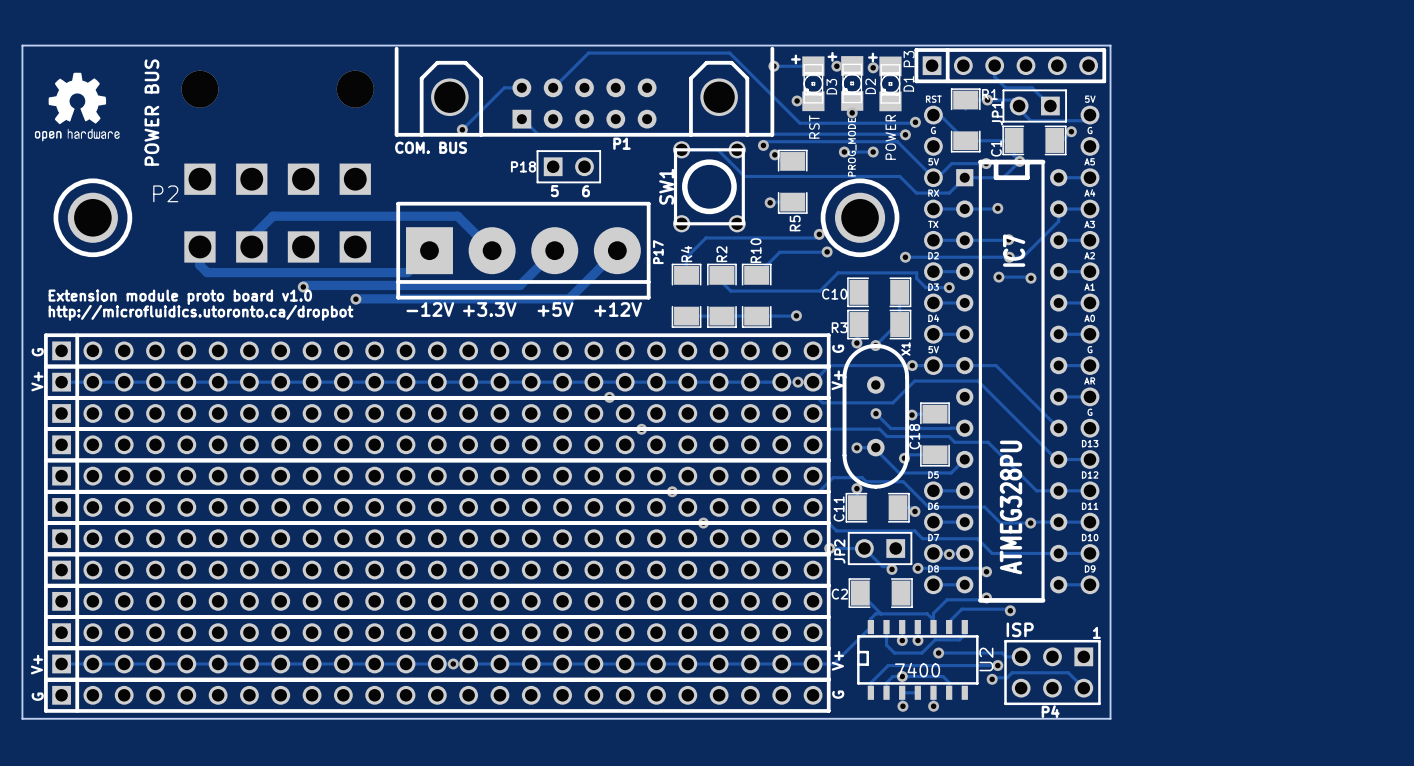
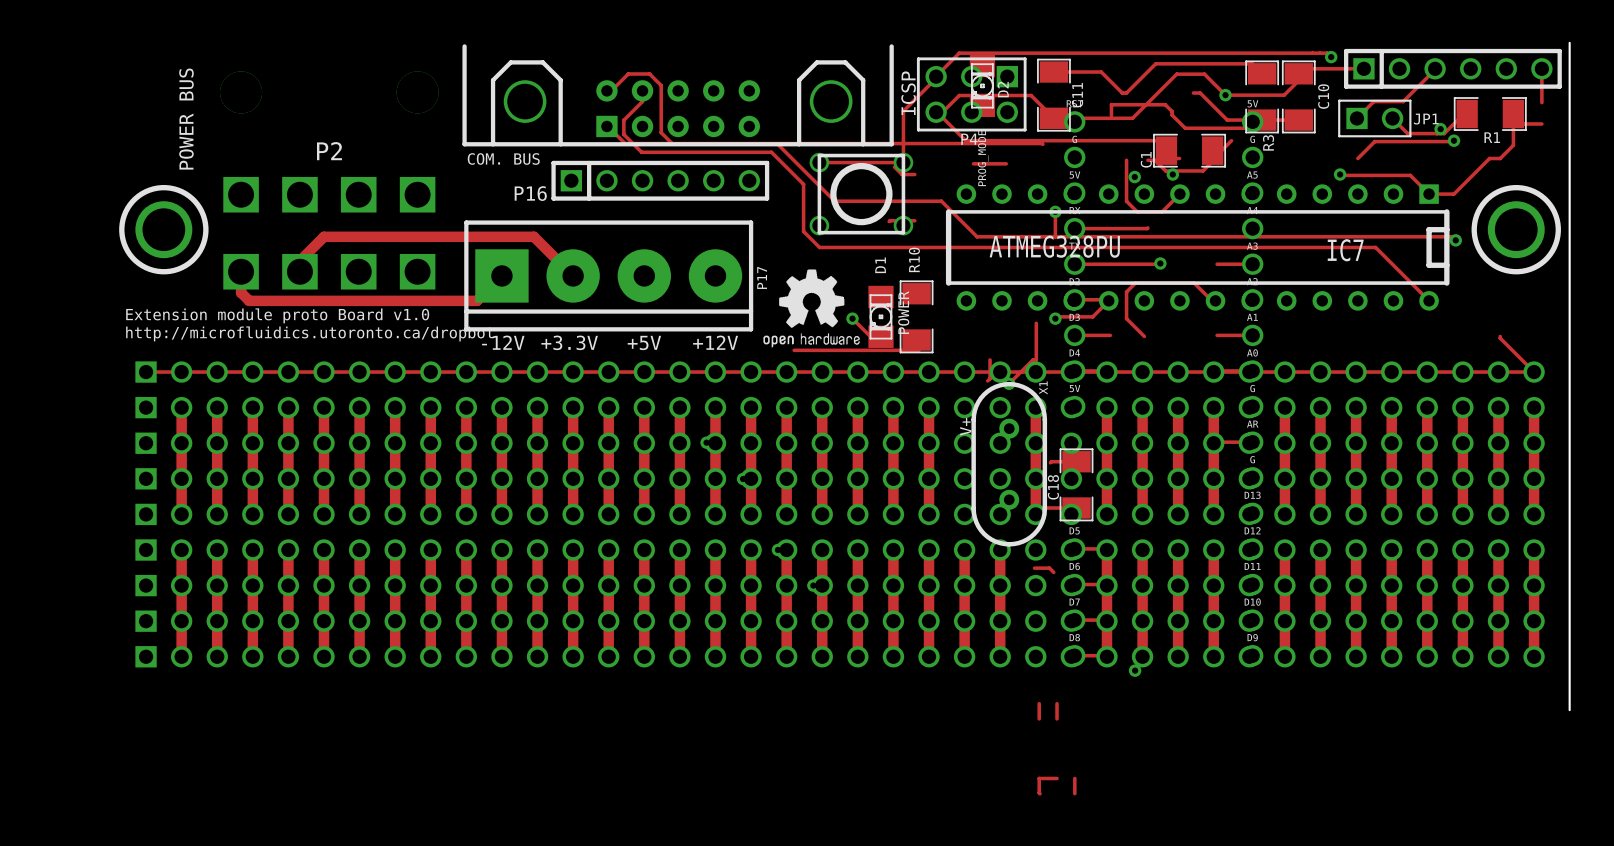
board edge: (22, 45) (22, 718) (1110, 718) (1110, 45) (22, 45) -> none
board edge: none -> (1569, 42) (1569, 710)
text: + (832, 56) -> none
text: + (872, 57) -> none
track: none -> (1331, 57) (1327, 53) (959, 53) (937, 76)
via: none -> (1331, 57)
text: + (795, 59) -> none
track: (994, 65) (994, 76) (1005, 87) (1032, 87) (1050, 106) -> none
P3: (1010, 65) -> none
track: (773, 66) (813, 66) -> none
via: (773, 66) -> none
via: (836, 66) -> none
via: (873, 67) -> none
track: none -> (1363, 68) (1303, 68) (1298, 73) (1298, 80) (1284, 95) (1225, 95) (1204, 74) (1176, 74) (1132, 118) (1053, 118) (1031, 95) (959, 95) (942, 112) (937, 112) (965, 140) (1157, 140) (1175, 158) (1179, 158)
track: none -> (1435, 68) (1403, 101) (1373, 101) (1357, 118)
part: none -> (1452, 68)
track: none -> (1541, 68) (1541, 102)
track: none -> (1053, 72) (1101, 72) (1122, 93) (1126, 93) (1155, 63) (1252, 63) (1262, 73)
drawing: [34, 72, 120, 142] -> none
track: none -> (936, 78) (903, 111) (903, 162) (819, 162)
D3: RST (813, 83) -> none
D1 position: (890, 83) -> (880, 316)
D1 name position: D1 (908, 83) -> D1 (880, 265)
track: (521, 87) (504, 87) (462, 129) -> (606, 90) (611, 90) (628, 73) (649, 73) (661, 85) (661, 132) (672, 144) (777, 144) (834, 201) (941, 201) (977, 236) (1452, 236) (1455, 240)
track: (553, 87) (588, 53) (729, 53) (799, 123) (915, 122) -> (642, 90) (642, 101) (623, 120) (623, 134) (641, 152) (771, 152) (803, 184) (803, 231) (819, 247) (1375, 247) (1429, 300)
track: none -> (1193, 93) (1200, 93) (1227, 120) (1298, 120)
text: none -> ICSP (908, 93)
via: none -> (1225, 95)
via: (797, 100) -> none
via: (987, 100) -> none
JP1 rotation: 0° (1034, 106) -> 180° (1374, 118)
JP1 position: (1034, 106) -> (1374, 118)
track: none -> (1513, 114) (1513, 145) (1500, 158) (1489, 158) (1453, 194) (1429, 194) (1410, 175) (1340, 174)
track: none -> (1513, 114) (1523, 123) (1541, 123)
via: (852, 112) -> none
track: none -> (1392, 118) (1407, 133) (1444, 133) (1463, 114) (1467, 114) (1462, 118)
track: (933, 115) (940, 115) (965, 140) (1014, 140) (1014, 155) (1019, 161) (1003, 177) (964, 177) (949, 193) (916, 193) (899, 176) (744, 176) (717, 149) (681, 149) -> none
R1 rotation: 0° (965, 120) -> 90° clockwise (1490, 114)
R1 position: (965, 120) -> (1490, 114)
via: none -> (1440, 129)
via: (915, 122) -> none
via: (462, 129) -> none
via: (1071, 131) -> none
track: none -> (1453, 140) (1374, 141) (1357, 158)
via: none -> (1453, 140)
via: (905, 134) -> none
D1 value position: POWER (890, 137) -> POWER (903, 312)
P1 name: P1 (621, 143) -> none
track: (763, 145) (767, 141) (897, 141) (933, 177) (937, 177) (951, 163) (986, 163) -> none
via: (763, 145) -> none
track: none -> (1215, 158) (1203, 170) (1165, 170) (1155, 160) (1147, 160)
track: none -> (1126, 160) (1126, 201) (1137, 211) (1162, 211) (1179, 194)
via: (844, 152) -> none
via: (873, 152) -> none
via: (774, 154) -> none
via: none -> (1340, 174)
P18: (568, 166) -> none
P16: none -> (660, 180)
track: (1058, 177) (1089, 177) -> none
part: none -> (861, 194)
R5: (792, 181) -> none
SW1: (709, 186) -> none
text: 5 (554, 191) -> none
text: 6 (586, 191) -> none
P2 name position: P2 (165, 193) -> P2 (329, 151)
track: none -> (1055, 211) (1055, 236)
via: none -> (1055, 211)
via: (770, 202) -> none
via: (997, 208) -> none
track: (1089, 209) (1058, 209) (1058, 221) (1022, 257) (905, 257) -> none
part: none -> (1516, 229)
part position: (92, 217) -> (163, 229)
part: (860, 217) -> none
via: none -> (1455, 240)
track: (819, 234) (815, 237) (705, 237) (686, 257) (686, 275) -> none
via: (819, 234) -> none
drawing: none -> [763, 269, 860, 348]
track: (554, 250) (519, 285) (304, 285) (303, 286) -> none
track: (617, 250) (569, 298) (355, 299) -> none
R10 name position: R10 (756, 250) -> R10 (914, 259)
track: (827, 251) (779, 252) (756, 275) -> none
via: (827, 251) -> none
via: (905, 257) -> none
via: (1009, 257) -> none
track: (1058, 271) (1089, 271) -> none
track: none -> (1108, 300) (1092, 316) (1057, 316) (1055, 318)
track: none -> (1215, 300) (1211, 300) (1194, 283) (1135, 283) (1126, 291) (1126, 318) (1144, 336)
track: (721, 275) (721, 282) (730, 291) (819, 291) (838, 272) (916, 272) (916, 278) (925, 287) (949, 287) -> none
track: (998, 277) (1031, 278) -> none
via: (998, 277) -> none
via: (1031, 278) -> none
via: (303, 286) -> none
via: (949, 287) -> none
track: none -> (852, 318) (870, 336) (880, 336)
via: none -> (852, 318)
via: none -> (1055, 318)
C10 rotation: 0° (879, 292) -> 90° clockwise (1298, 96)
C10 position: (879, 292) -> (1298, 96)
C10 name position: C10 (834, 294) -> C10 (1323, 96)
R4: (686, 295) -> none
R2: (721, 295) -> none
R10 position: (756, 295) -> (916, 316)
text: Extension module proto board v1.0 (180, 297) -> Extension module proto Board v1.0 (277, 315)
via: (355, 299) -> none
track: none -> (1500, 336) (1534, 372) (146, 372)
text position: http://microfluidics.utoronto.ca/dropbot (201, 312) -> http://microfluidics.utoronto.ca/dropbot (309, 333)
via: (796, 315) -> none
R3 rotation: 0° (879, 324) -> 90° clockwise (1262, 96)
R3 position: (879, 324) -> (1262, 96)
R3 name position: R3 (839, 327) -> R3 (1268, 142)
part: none -> (840, 372)
via: (856, 343) -> none
text: G (838, 348) -> none
part: (437, 350) -> none
text: G (37, 352) -> none
via: (912, 365) -> none
track: (1058, 365) (1089, 365) -> none
track: none -> (181, 407) (181, 514)
track: none -> (217, 407) (217, 514)
track: none -> (252, 407) (252, 514)
track: none -> (288, 407) (288, 514)
track: none -> (324, 407) (324, 514)
track: none -> (359, 407) (359, 514)
track: none -> (395, 407) (395, 514)
track: none -> (430, 407) (430, 514)
track: none -> (466, 407) (466, 514)
track: none -> (501, 407) (501, 514)
track: none -> (537, 407) (537, 514)
track: none -> (573, 407) (573, 514)
track: none -> (608, 407) (608, 514)
track: none -> (644, 407) (644, 514)
track: none -> (679, 407) (679, 514)
track: none -> (715, 407) (715, 514)
track: none -> (751, 407) (751, 514)
track: none -> (786, 407) (786, 514)
track: none -> (822, 407) (822, 514)
part: none -> (840, 407)
track: none -> (857, 407) (857, 514)
track: none -> (893, 407) (893, 514)
track: none -> (929, 407) (929, 514)
track: none -> (1035, 407) (1035, 514)
track: none -> (1106, 407) (1106, 514)
track: none -> (1142, 407) (1142, 514)
track: none -> (1178, 407) (1178, 514)
track: none -> (1213, 407) (1213, 514)
track: none -> (1284, 407) (1284, 514)
track: none -> (1320, 407) (1320, 514)
track: none -> (1356, 407) (1356, 514)
track: none -> (1391, 407) (1391, 514)
track: none -> (1427, 407) (1427, 514)
track: none -> (1462, 407) (1462, 514)
track: none -> (1498, 407) (1498, 514)
track: none -> (1534, 407) (1534, 514)
text: V+ (37, 381) -> none
IC7 rotation: 0° (1011, 381) -> 90° clockwise (1197, 247)
track: (61, 382) (813, 382) (829, 365) (996, 365) (1058, 428) -> none
part: (437, 382) -> none
via: (798, 382) -> none
track: (609, 397) (816, 397) (822, 402) (892, 402) (914, 381) (978, 381) (1056, 459) (1089, 459) -> none
part: none -> (840, 443)
part: (437, 413) -> none
track: (876, 413) (890, 428) (964, 428) -> none
via: (876, 413) -> none
via: (912, 415) -> none
track: (641, 429) (879, 429) (886, 436) (948, 436) (954, 442) (988, 442) (1036, 490) (1089, 490) -> none
part: none -> (840, 478)
part: (437, 444) -> none
track: (856, 447) (875, 447) (899, 472) (951, 472) (964, 459) -> none
via: (856, 447) -> none
via: (904, 458) -> none
part: none -> (840, 514)
part: (437, 476) -> none
via: (856, 488) -> none
track: none -> (181, 550) (181, 656)
track: none -> (217, 550) (217, 656)
track: none -> (252, 550) (252, 656)
track: none -> (288, 550) (288, 656)
track: none -> (324, 550) (324, 656)
track: none -> (359, 550) (359, 656)
track: none -> (395, 550) (395, 656)
track: none -> (430, 550) (430, 656)
track: none -> (466, 550) (466, 656)
track: none -> (501, 550) (501, 656)
track: none -> (537, 550) (537, 656)
track: none -> (573, 550) (573, 656)
track: none -> (608, 550) (608, 656)
track: none -> (644, 550) (644, 656)
track: none -> (679, 550) (679, 656)
track: none -> (715, 550) (715, 656)
track: none -> (751, 550) (751, 656)
track: (672, 491) (819, 491) (833, 477) (862, 477) (866, 481) (903, 481) (928, 507) (984, 507) (1000, 523) (1089, 522) -> none
track: none -> (786, 550) (786, 656)
track: none -> (822, 550) (822, 656)
part: none -> (840, 550)
track: none -> (857, 550) (857, 656)
track: none -> (893, 550) (893, 656)
track: none -> (929, 550) (929, 656)
track: none -> (964, 550) (964, 656)
track: none -> (1000, 550) (1000, 656)
track: none -> (1106, 550) (1106, 656)
track: none -> (1142, 550) (1142, 656)
track: none -> (1178, 550) (1178, 656)
track: none -> (1213, 550) (1213, 656)
track: none -> (1284, 550) (1284, 656)
track: none -> (1320, 550) (1320, 656)
track: none -> (1356, 550) (1356, 656)
track: none -> (1391, 550) (1391, 656)
track: none -> (1427, 550) (1427, 656)
track: none -> (1462, 550) (1462, 656)
track: none -> (1498, 550) (1498, 656)
track: none -> (1534, 550) (1534, 656)
part: (437, 507) -> none
C11 rotation: 0° (877, 507) -> 90° clockwise (1053, 95)
C11 position: (877, 507) -> (1053, 95)
C11 name position: C11 (839, 508) -> C11 (1077, 95)
via: (914, 511) -> none
track: (703, 523) (828, 523) (836, 530) (914, 530) (922, 538) (977, 538) (992, 553) (1089, 553) -> none
part: none -> (840, 585)
via: (1030, 523) -> none
part: (437, 538) -> none
track: (829, 548) (864, 548) (882, 566) (889, 566) (891, 569) -> none
via: (829, 548) -> none
JP2: (880, 548) -> none
part: none -> (840, 621)
via: (949, 554) -> none
track: (917, 568) (983, 568) (986, 571) -> none
via: (917, 568) -> none
via: (891, 569) -> none
part: (437, 570) -> none
via: (986, 571) -> none
track: (1058, 584) (1089, 584) -> none
part: none -> (840, 656)
track: (860, 593) (881, 613) -> none
C2: (880, 593) -> none
track: (986, 597) (984, 599) (947, 599) (933, 613) (933, 627) -> none
part: (437, 601) -> none
track: (1010, 610) (1008, 609) (961, 609) (949, 621) (949, 627) -> none
via: (1010, 610) -> none
track: (933, 620) (927, 613) (875, 613) (870, 618) (870, 627) (833, 663) (61, 663) -> none
track: (886, 627) (886, 645) (894, 653) (922, 653) (935, 639) (959, 639) (964, 634) (964, 627) -> none
text: ISP (1020, 629) -> none
part: (437, 632) -> none
text: 1 (1096, 632) -> none
via: (902, 640) -> none
via: (917, 640) -> none
track: (938, 653) (1002, 653) (1006, 656) (1021, 656) -> none
via: (938, 653) -> none
U2: 7400 (917, 659) -> none
text: V+ (837, 660) -> none
part: (437, 663) -> none
via: (453, 663) -> none
text: V+ (36, 664) -> none
track: (997, 665) (888, 665) (870, 682) (870, 692) -> none
via: (997, 665) -> none
P4 position: (1052, 672) -> (971, 94)
via: (902, 676) -> none
track: (992, 679) (1007, 677) (1012, 672) (1068, 672) (1083, 688) -> none
via: (992, 679) -> none
track: (886, 692) (886, 682) (892, 676) (943, 676) (949, 682) (949, 692) -> none
text: G (838, 694) -> none
part: (437, 695) -> none
text: G (37, 696) -> none
via: (902, 706) -> none
via: (933, 706) -> none

